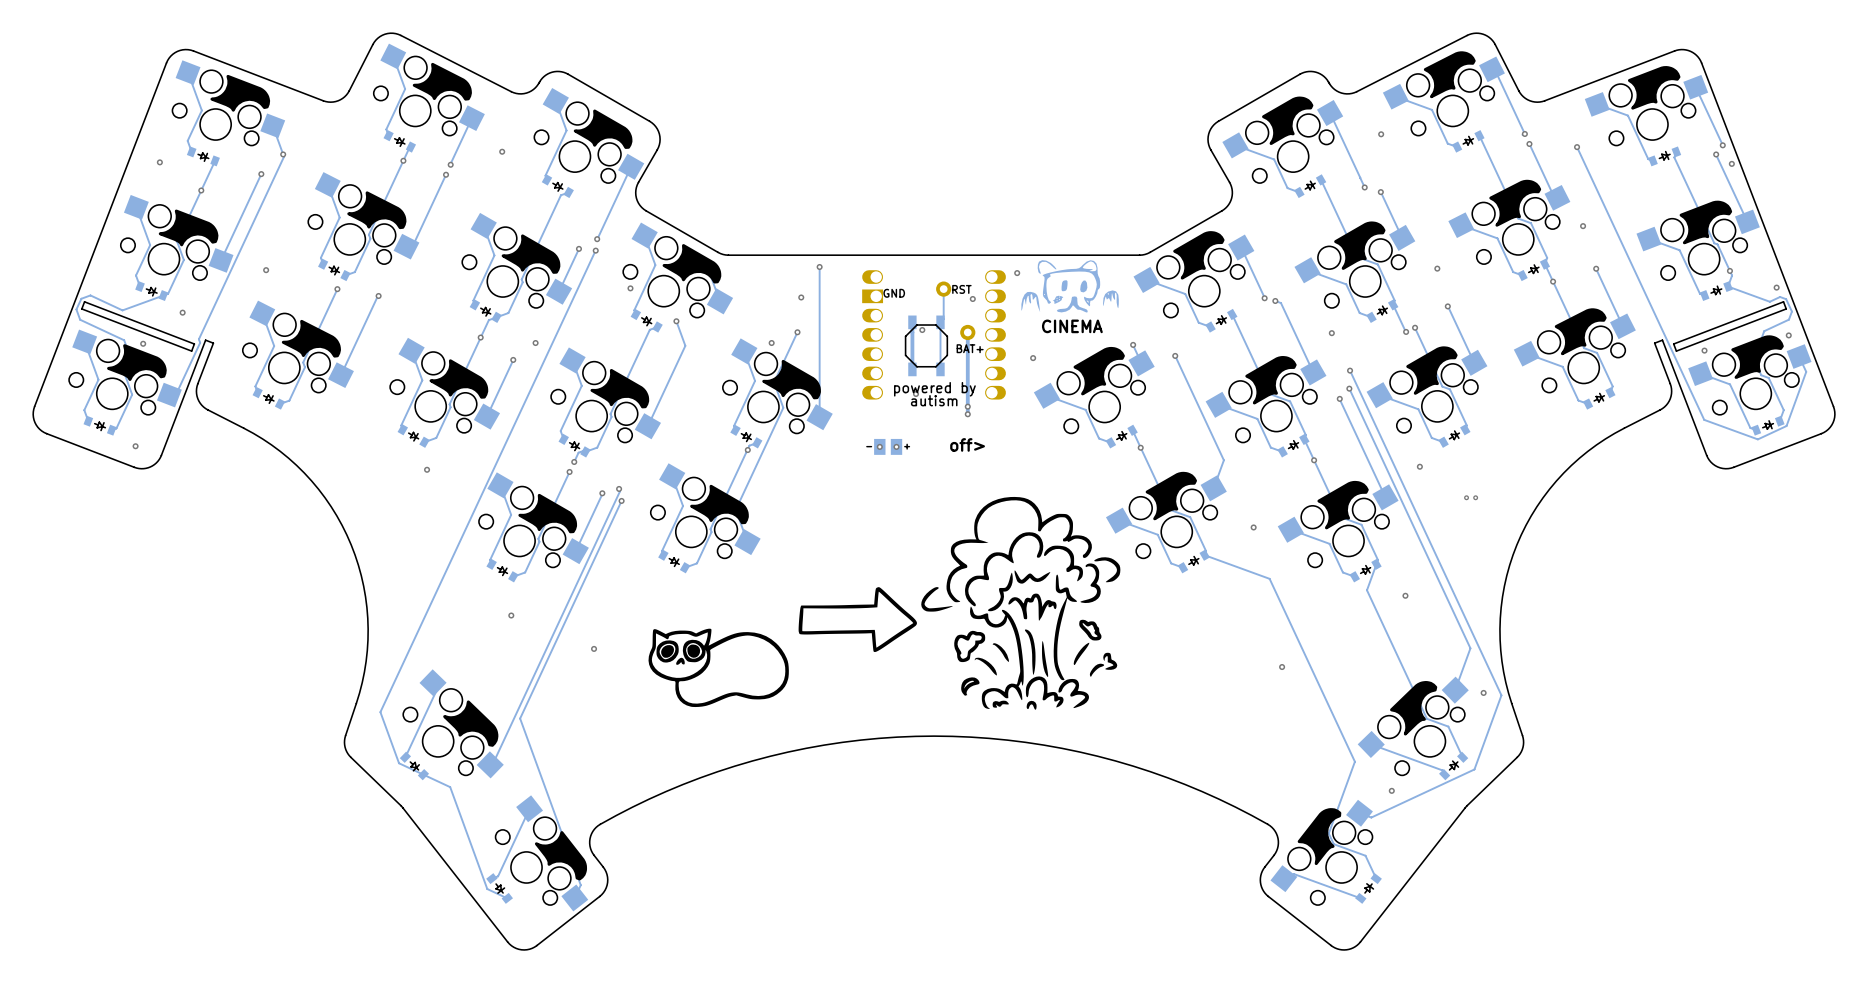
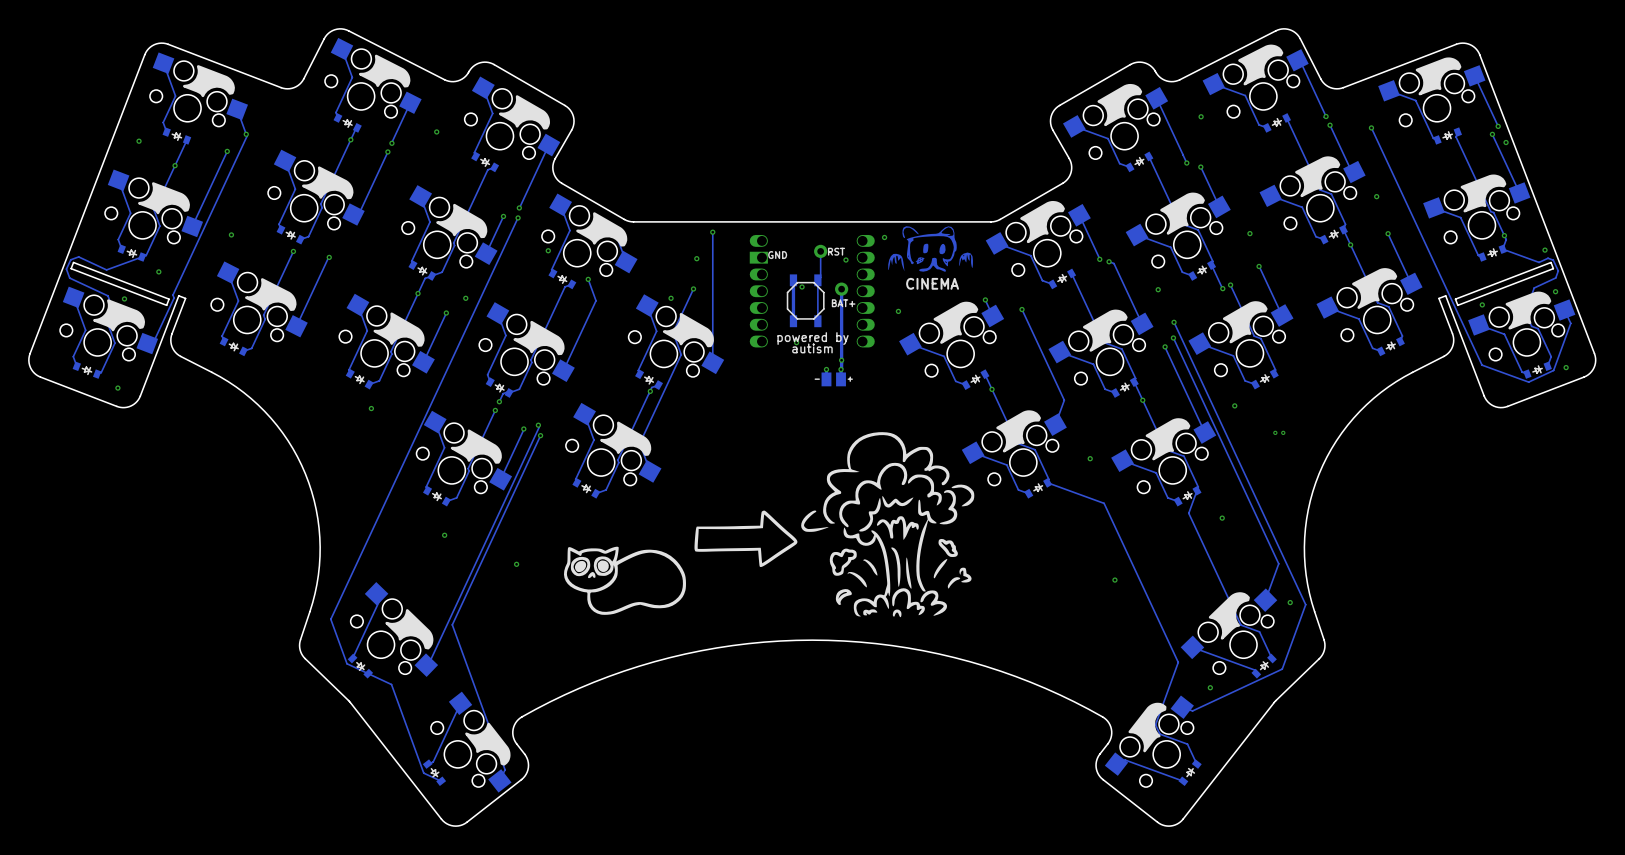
via: (967, 406) -> none
track: none -> (841, 360) (841, 369)
via: none -> (1566, 367)
via: none -> (826, 369)
via: none -> (841, 369)
part: none -> (833, 378)
text: off> (967, 444) -> none
via: (879, 446) -> none
part: (888, 446) -> none
via: (896, 446) -> none

